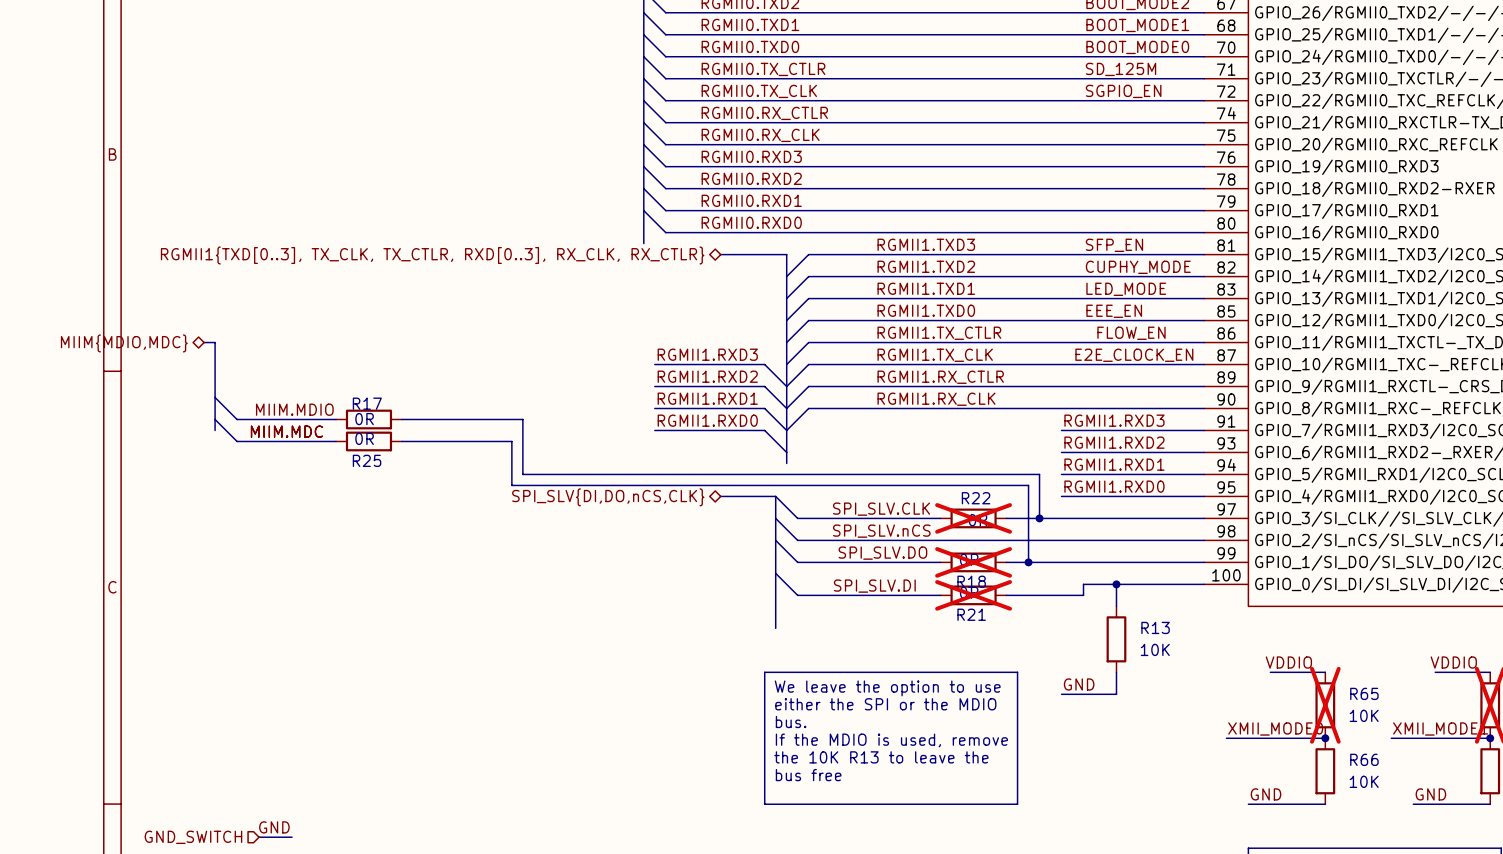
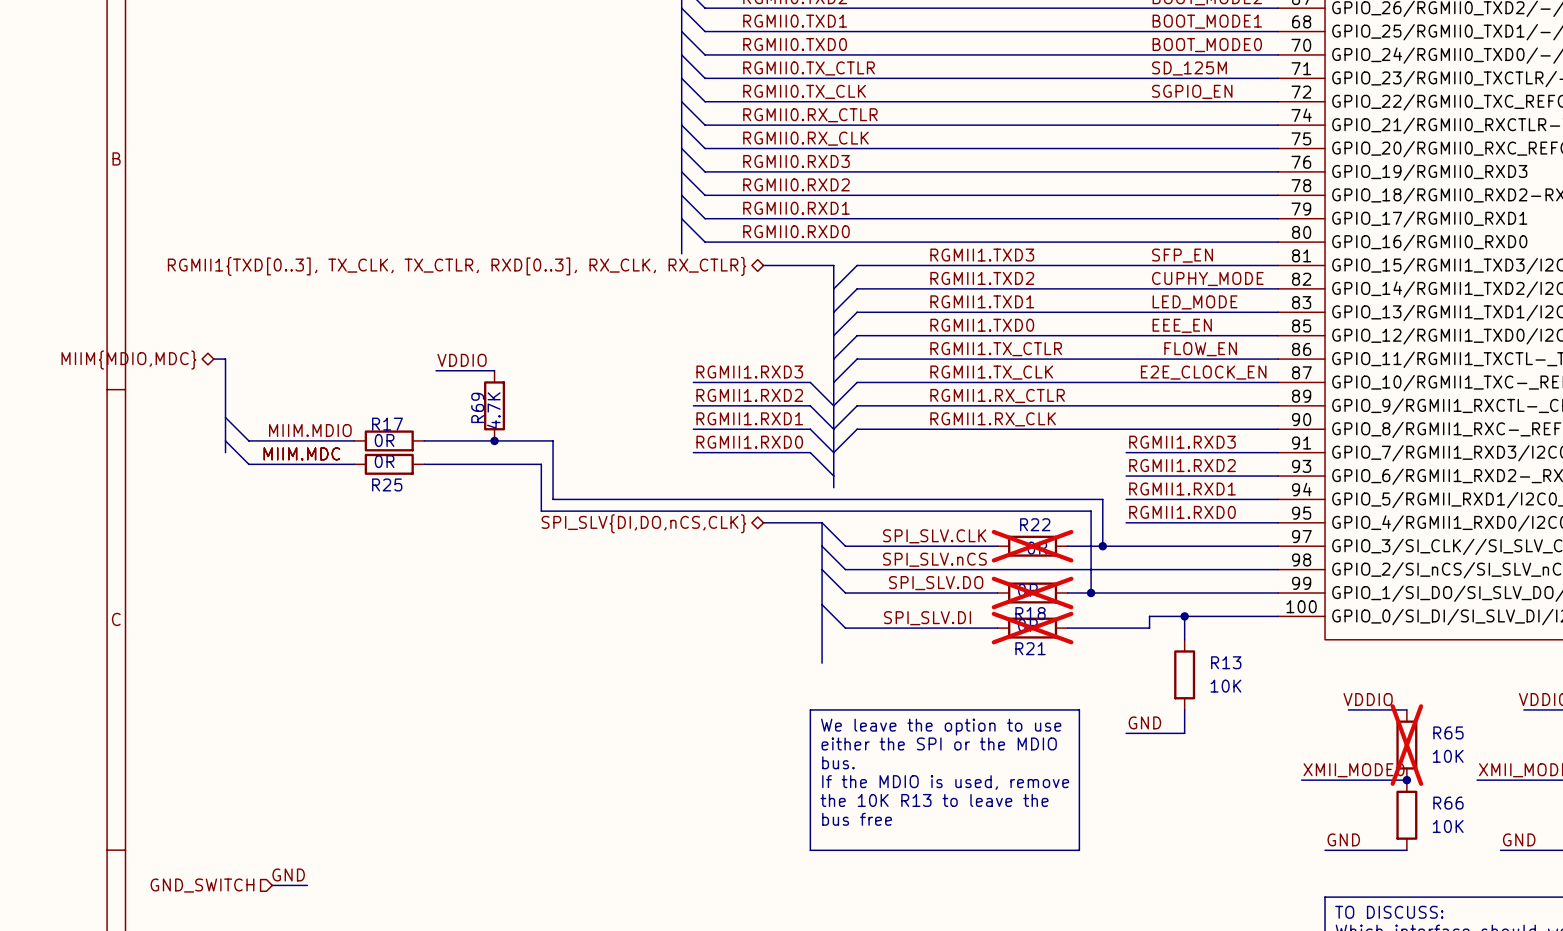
label: none -> VDDIO (462, 360)
wire: none -> (436, 370) (494, 370)
R69: none -> 4.7K (494, 405)
junction: none -> (494, 440)

